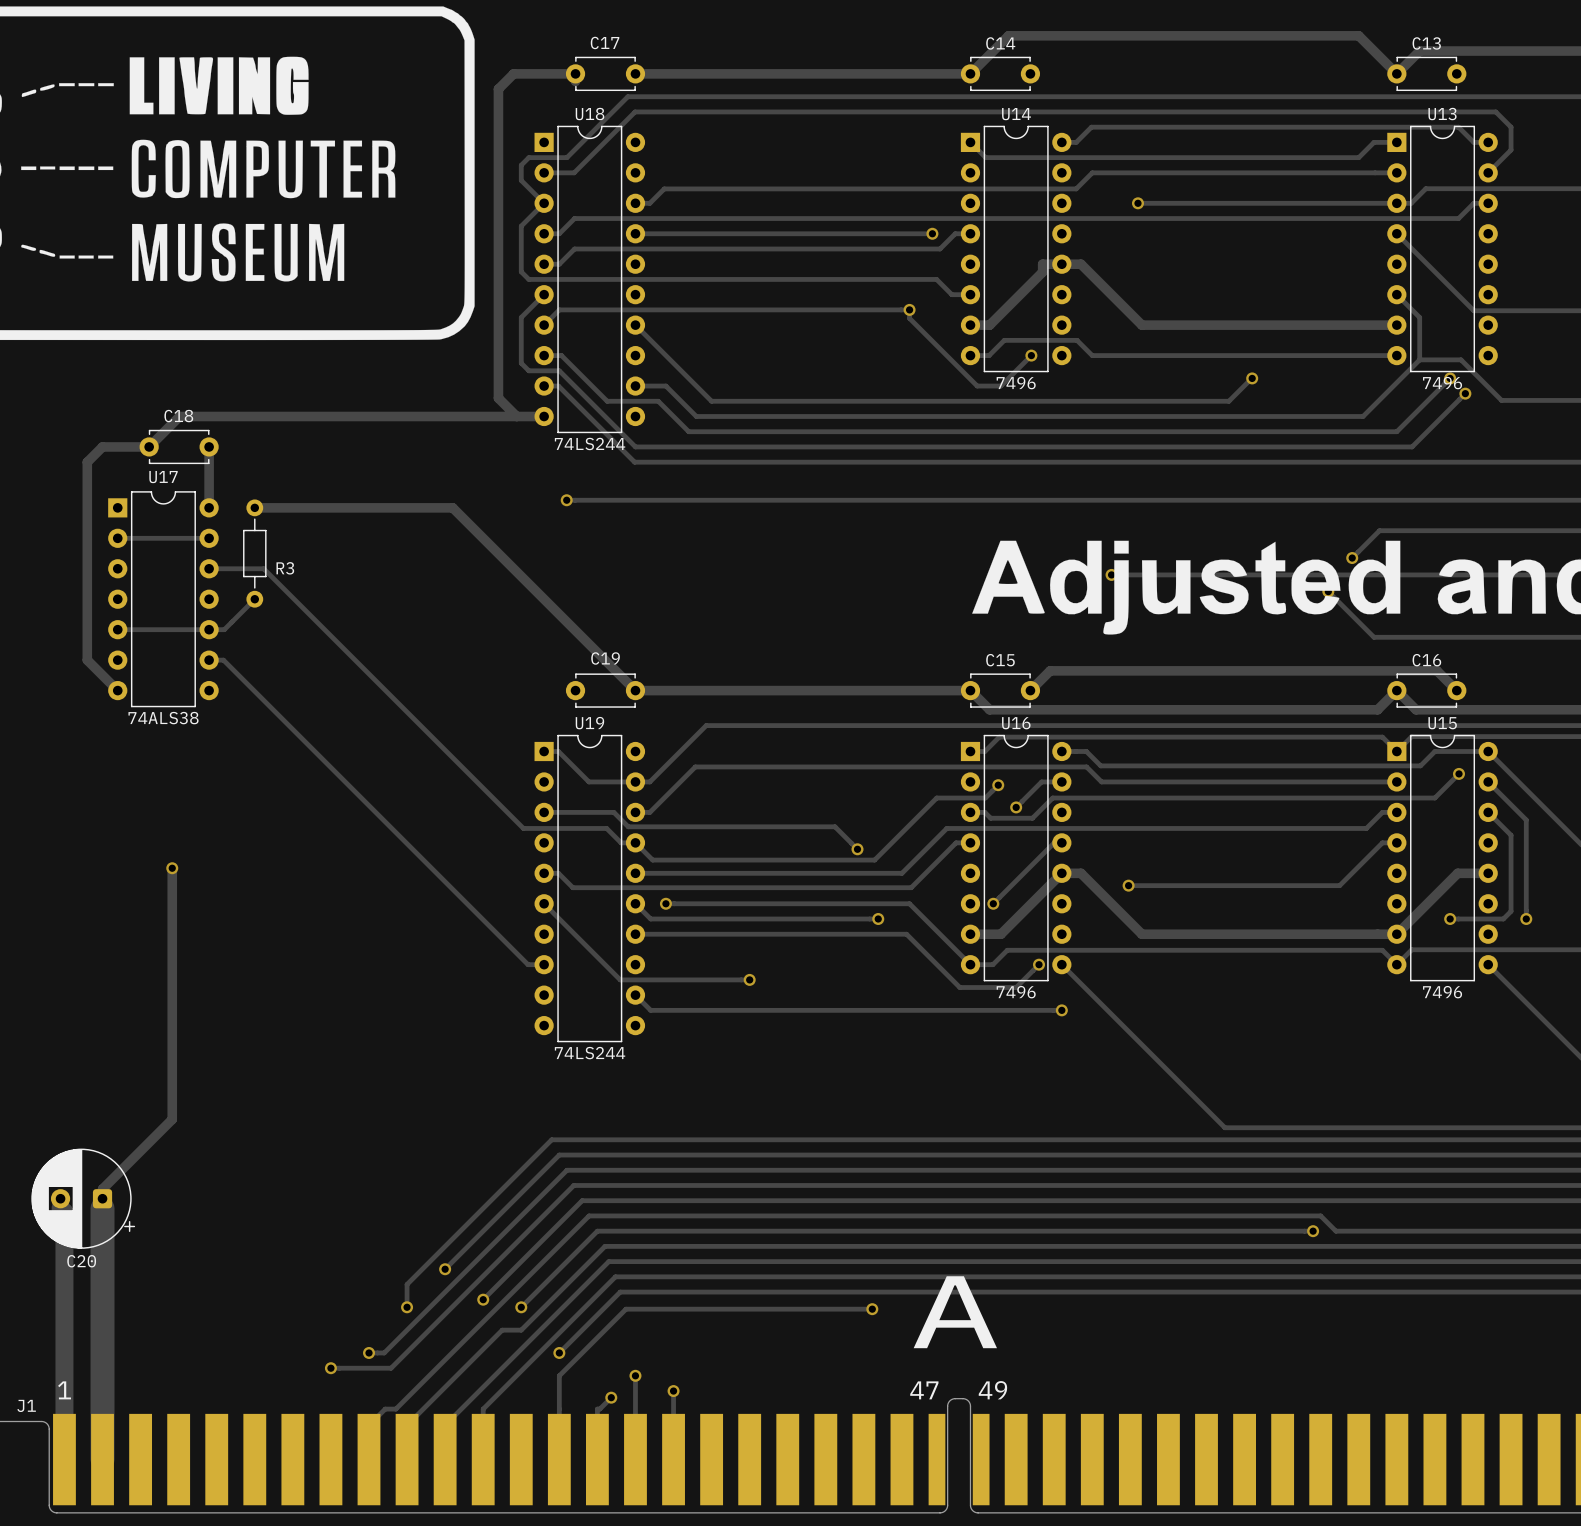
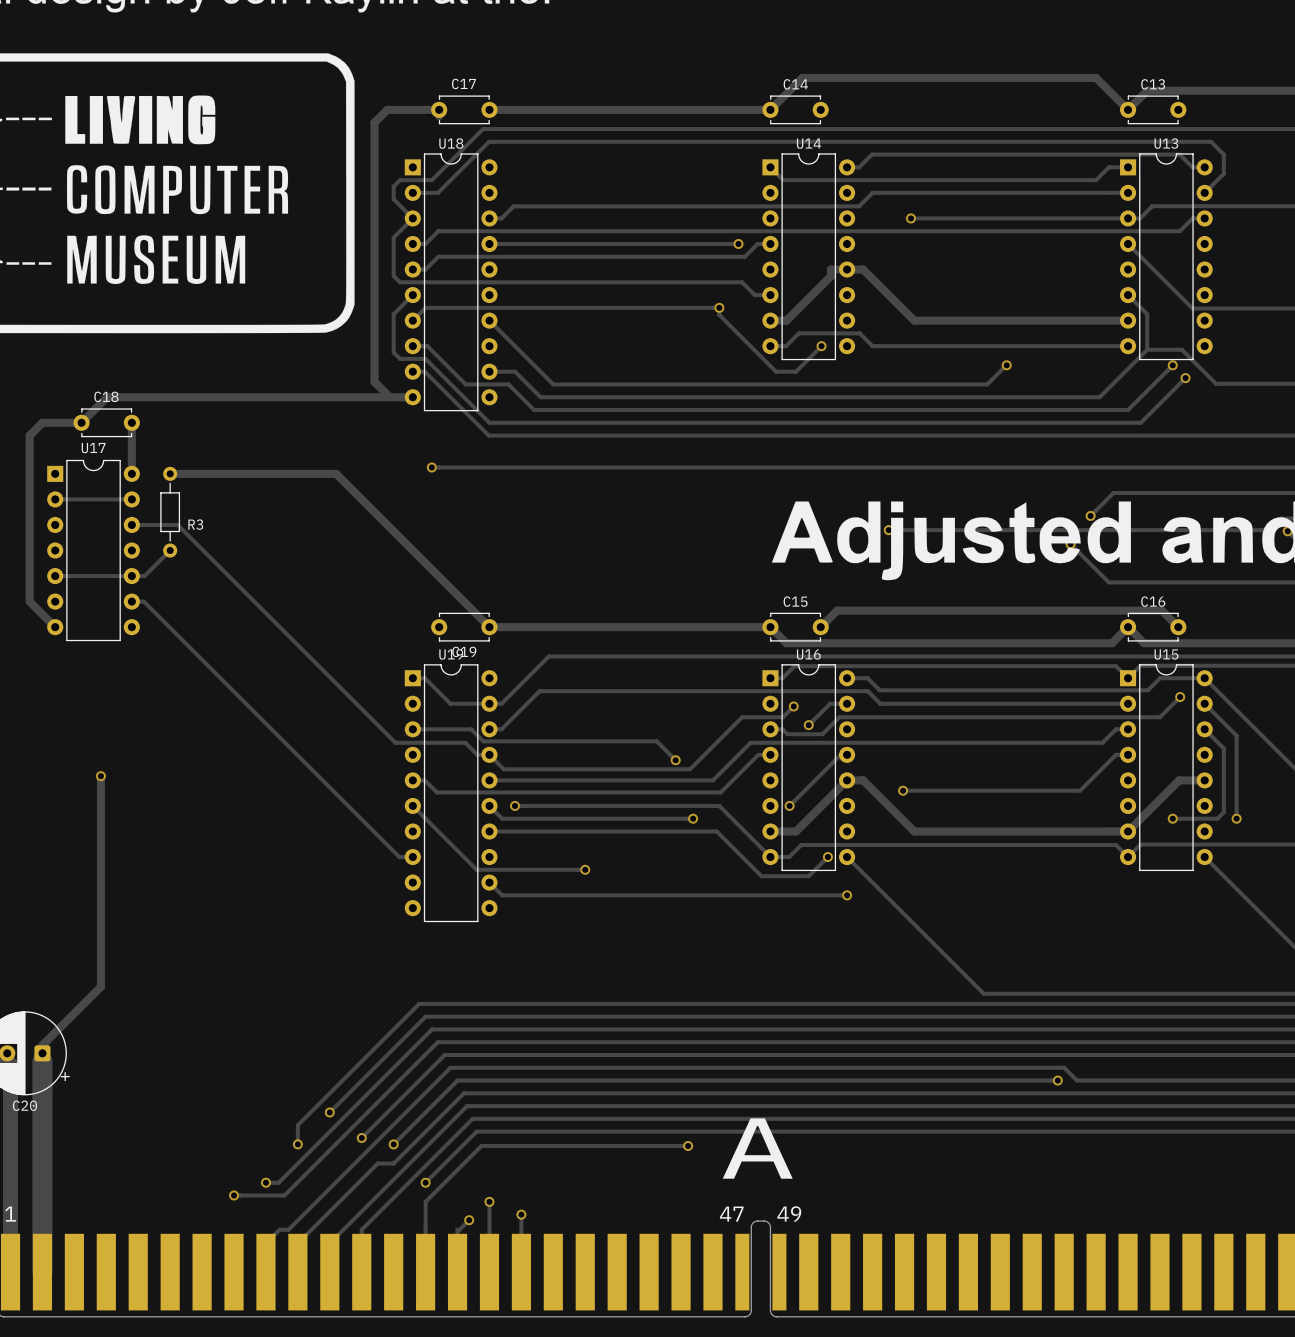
U14 value: 7496 (1016, 383) -> none
U13 value: 7496 (1442, 383) -> none
U18 value: 74LS244 (590, 443) -> none
C19 name position: C19 (605, 658) -> C19 (464, 651)
U17 value: 74ALS38 (163, 718) -> none
U16 value: 7496 (1016, 992) -> none
U15 value: 7496 (1442, 992) -> none
U19 value: 74LS244 (590, 1053) -> none

